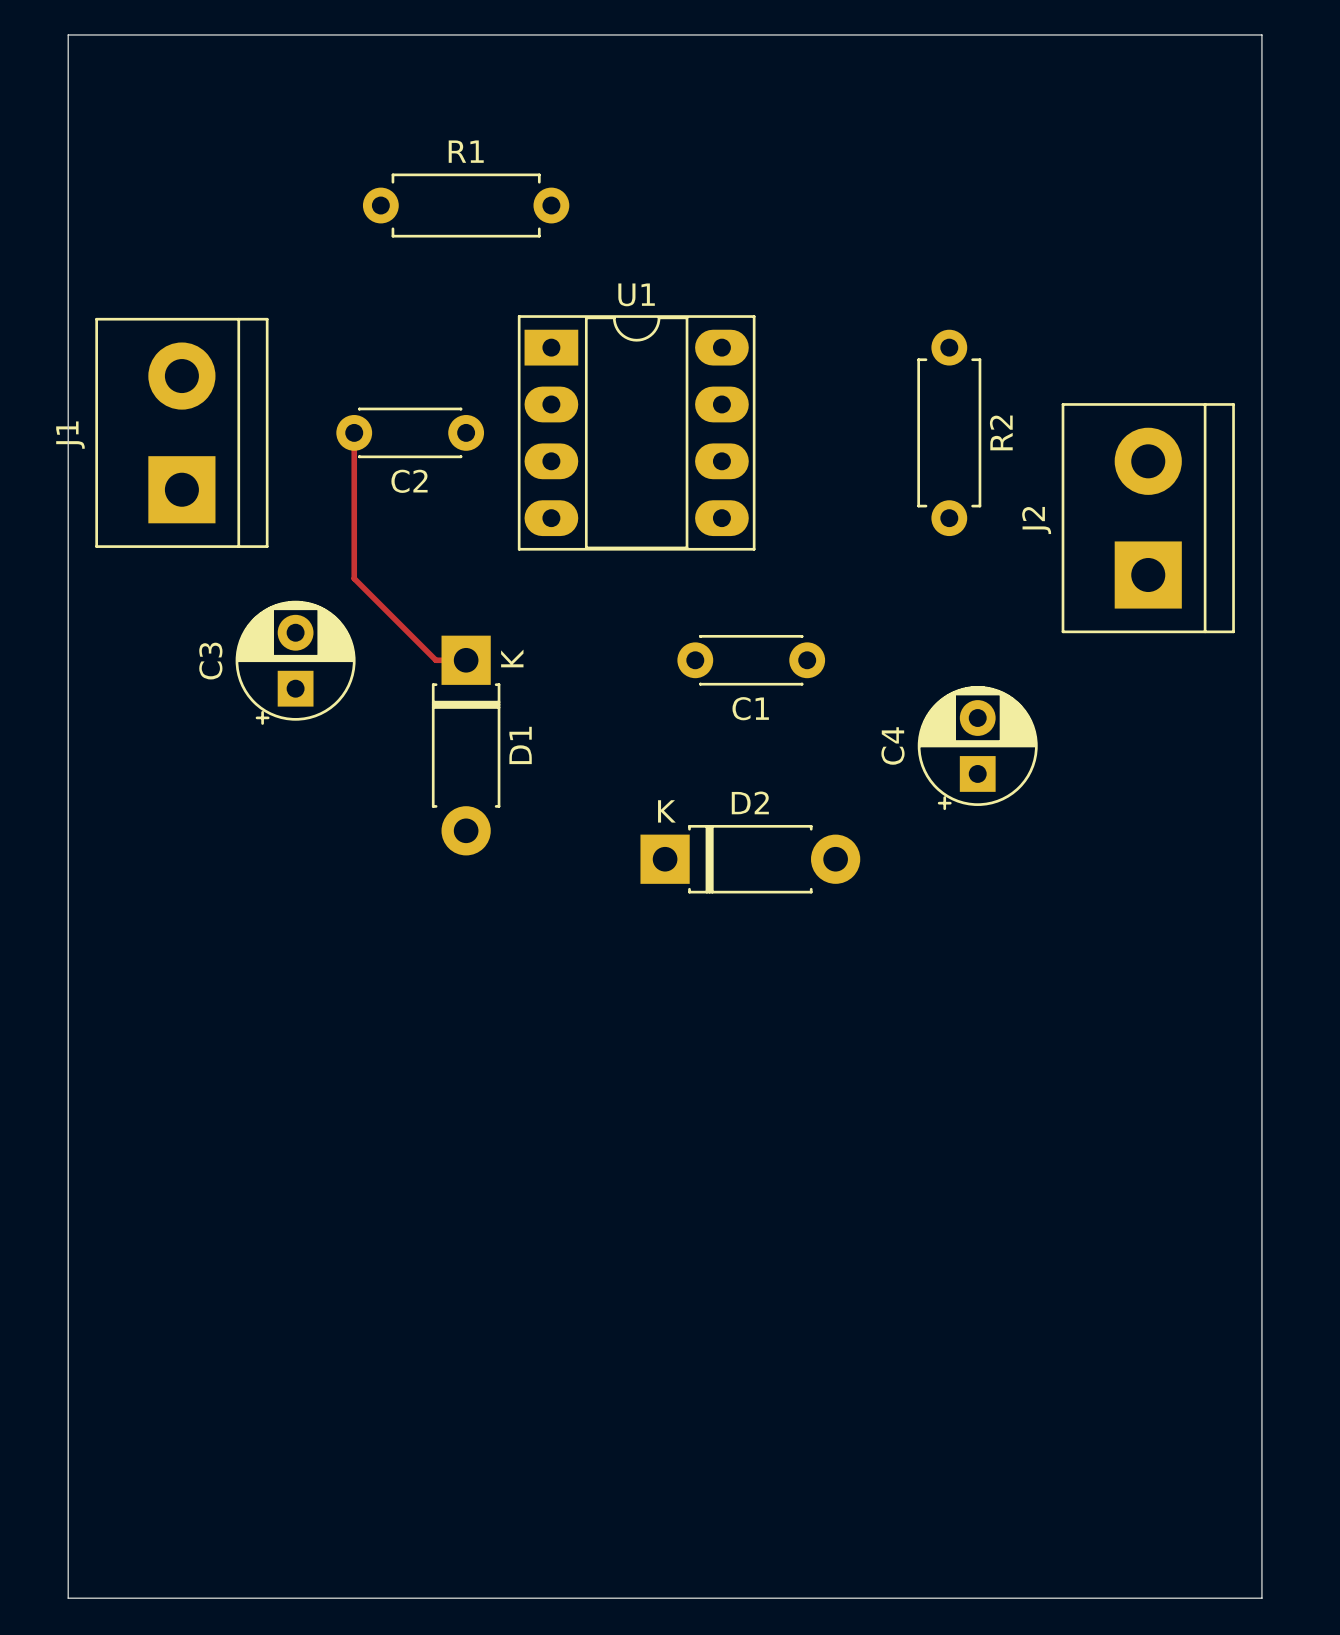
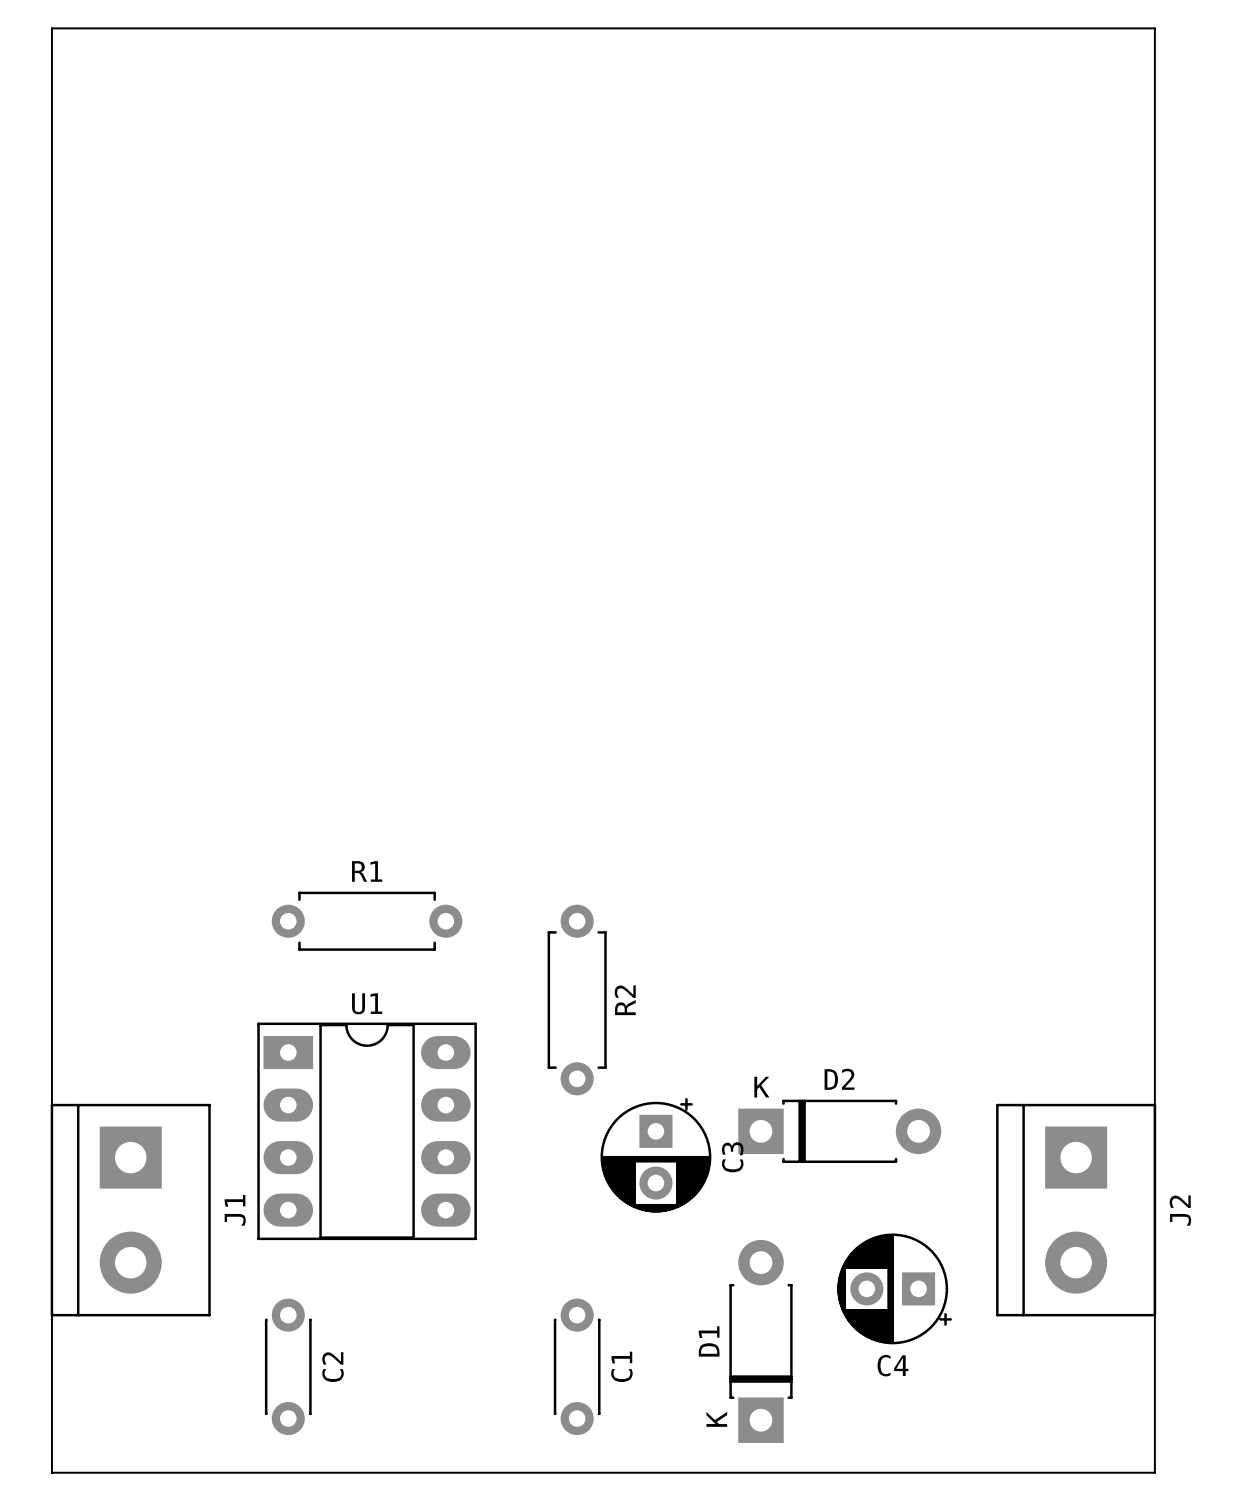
R1 position: (466, 205) -> (367, 921)
J1 rotation: 0° (181, 432) -> 180° (130, 1210)
J1 position: (181, 432) -> (130, 1210)
track: (354, 432) (354, 578) (435, 660) (466, 660) -> none
C2 rotation: 0° (410, 432) -> 90° clockwise (288, 1366)
C2 position: (410, 432) -> (288, 1366)
U1 position: (636, 432) -> (367, 1131)
R2 position: (949, 432) -> (577, 1000)
C2 name position: C2 (409, 481) -> C2 (333, 1367)
J2 rotation: 0° (1148, 518) -> 180° (1076, 1210)
J2 position: (1148, 518) -> (1076, 1210)
C1 rotation: 0° (751, 660) -> 90° clockwise (577, 1366)
C1 position: (751, 660) -> (577, 1366)
C3 rotation: 0° (295, 662) -> 180° (655, 1155)
C3 position: (295, 662) -> (655, 1155)
C1 name position: C1 (750, 708) -> C1 (621, 1366)
D1 rotation: 0° (466, 745) -> 180° (760, 1341)
D1 position: (466, 745) -> (760, 1341)
C4 rotation: 0° (977, 748) -> 90° counterclockwise (894, 1288)
C4 position: (977, 748) -> (894, 1288)
D2 position: (750, 859) -> (839, 1131)

